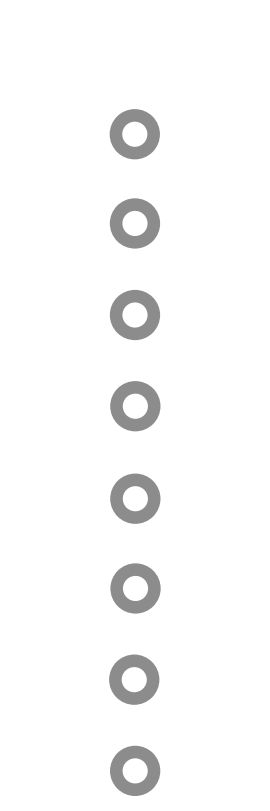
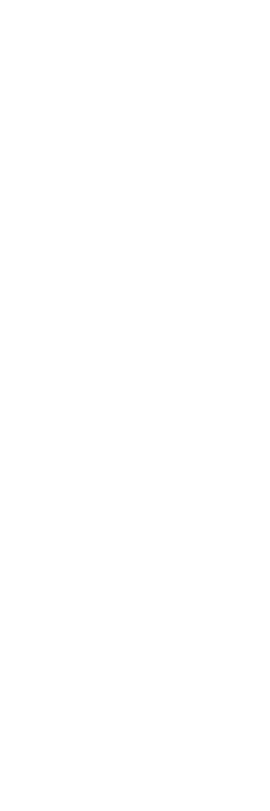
part: (134, 134) -> none
part: (134, 223) -> none
part: (134, 315) -> none
part: (135, 406) -> none
part: (135, 498) -> none
part: (135, 588) -> none
part: (134, 679) -> none
part: (135, 770) -> none

